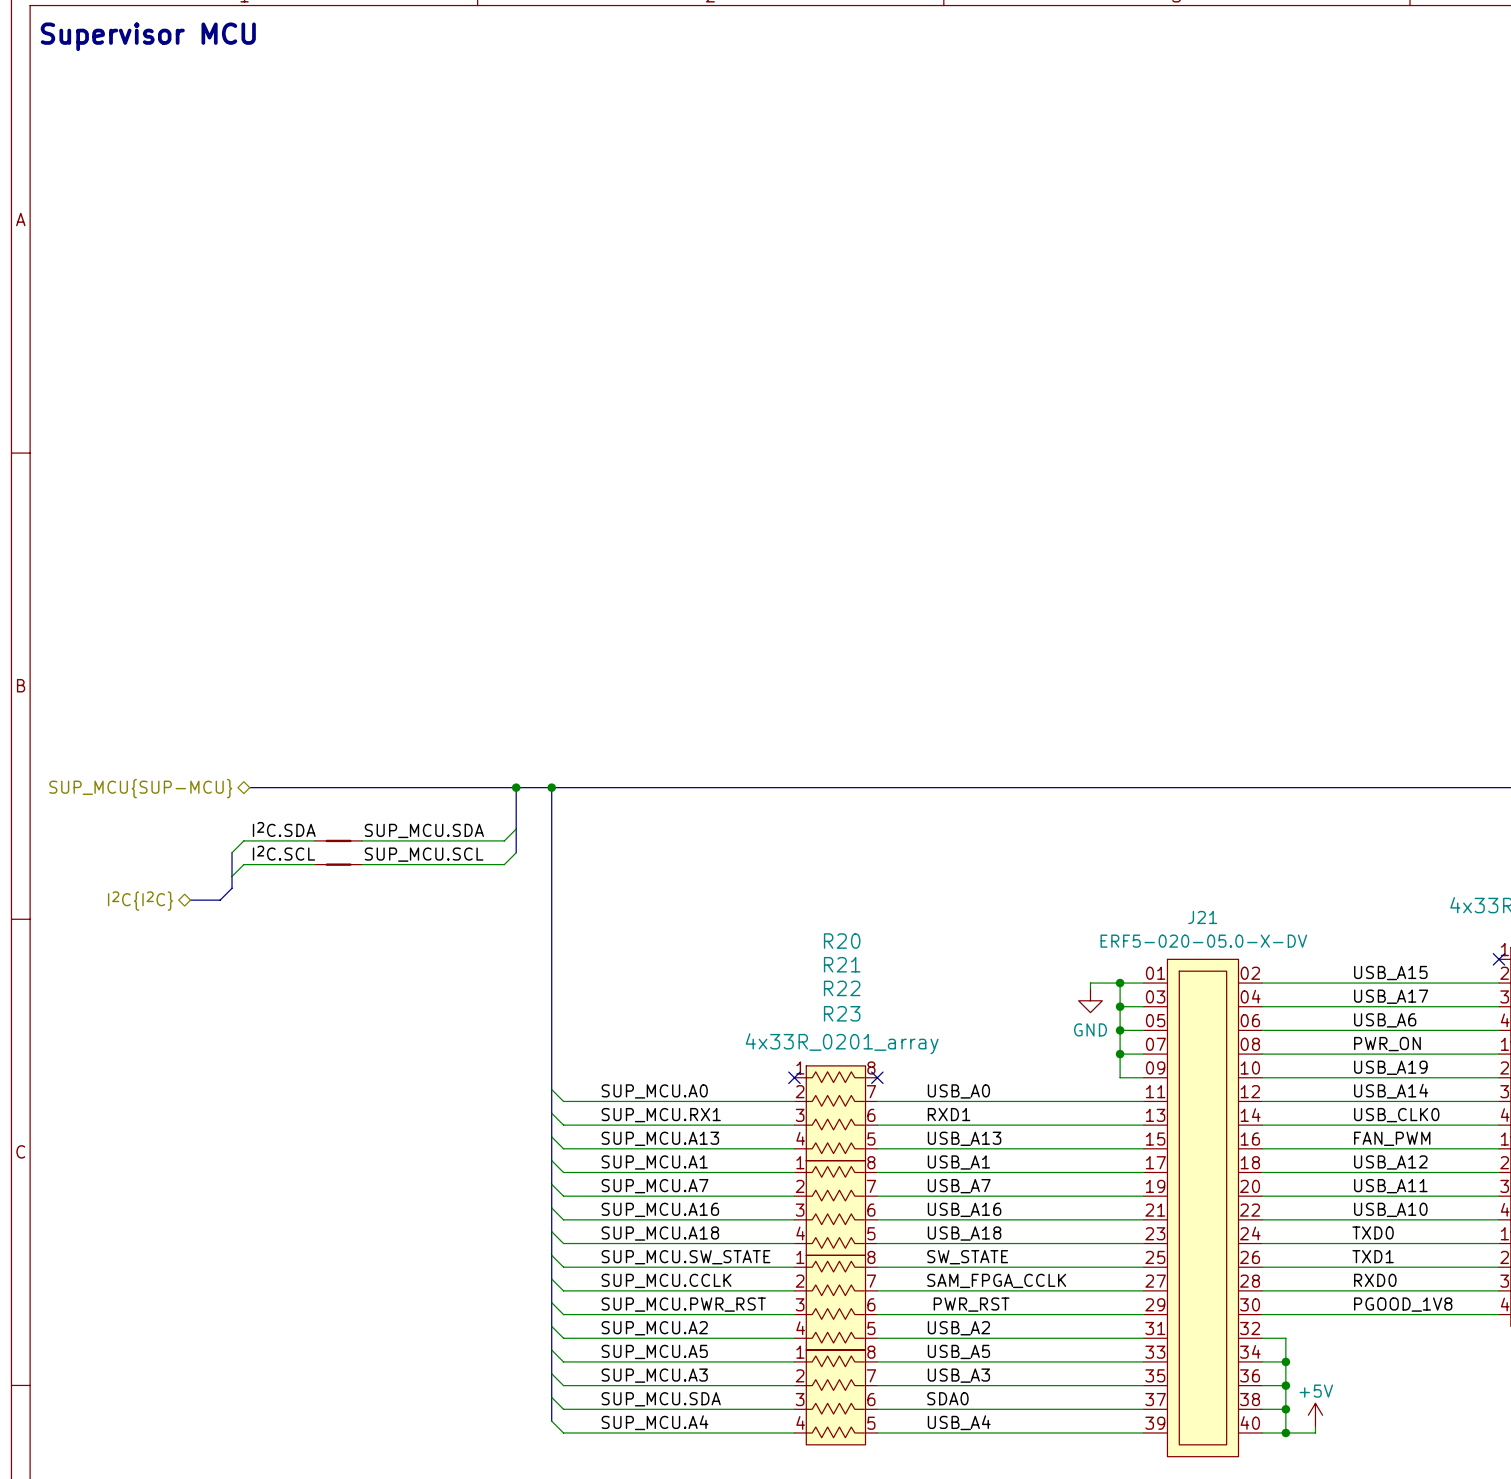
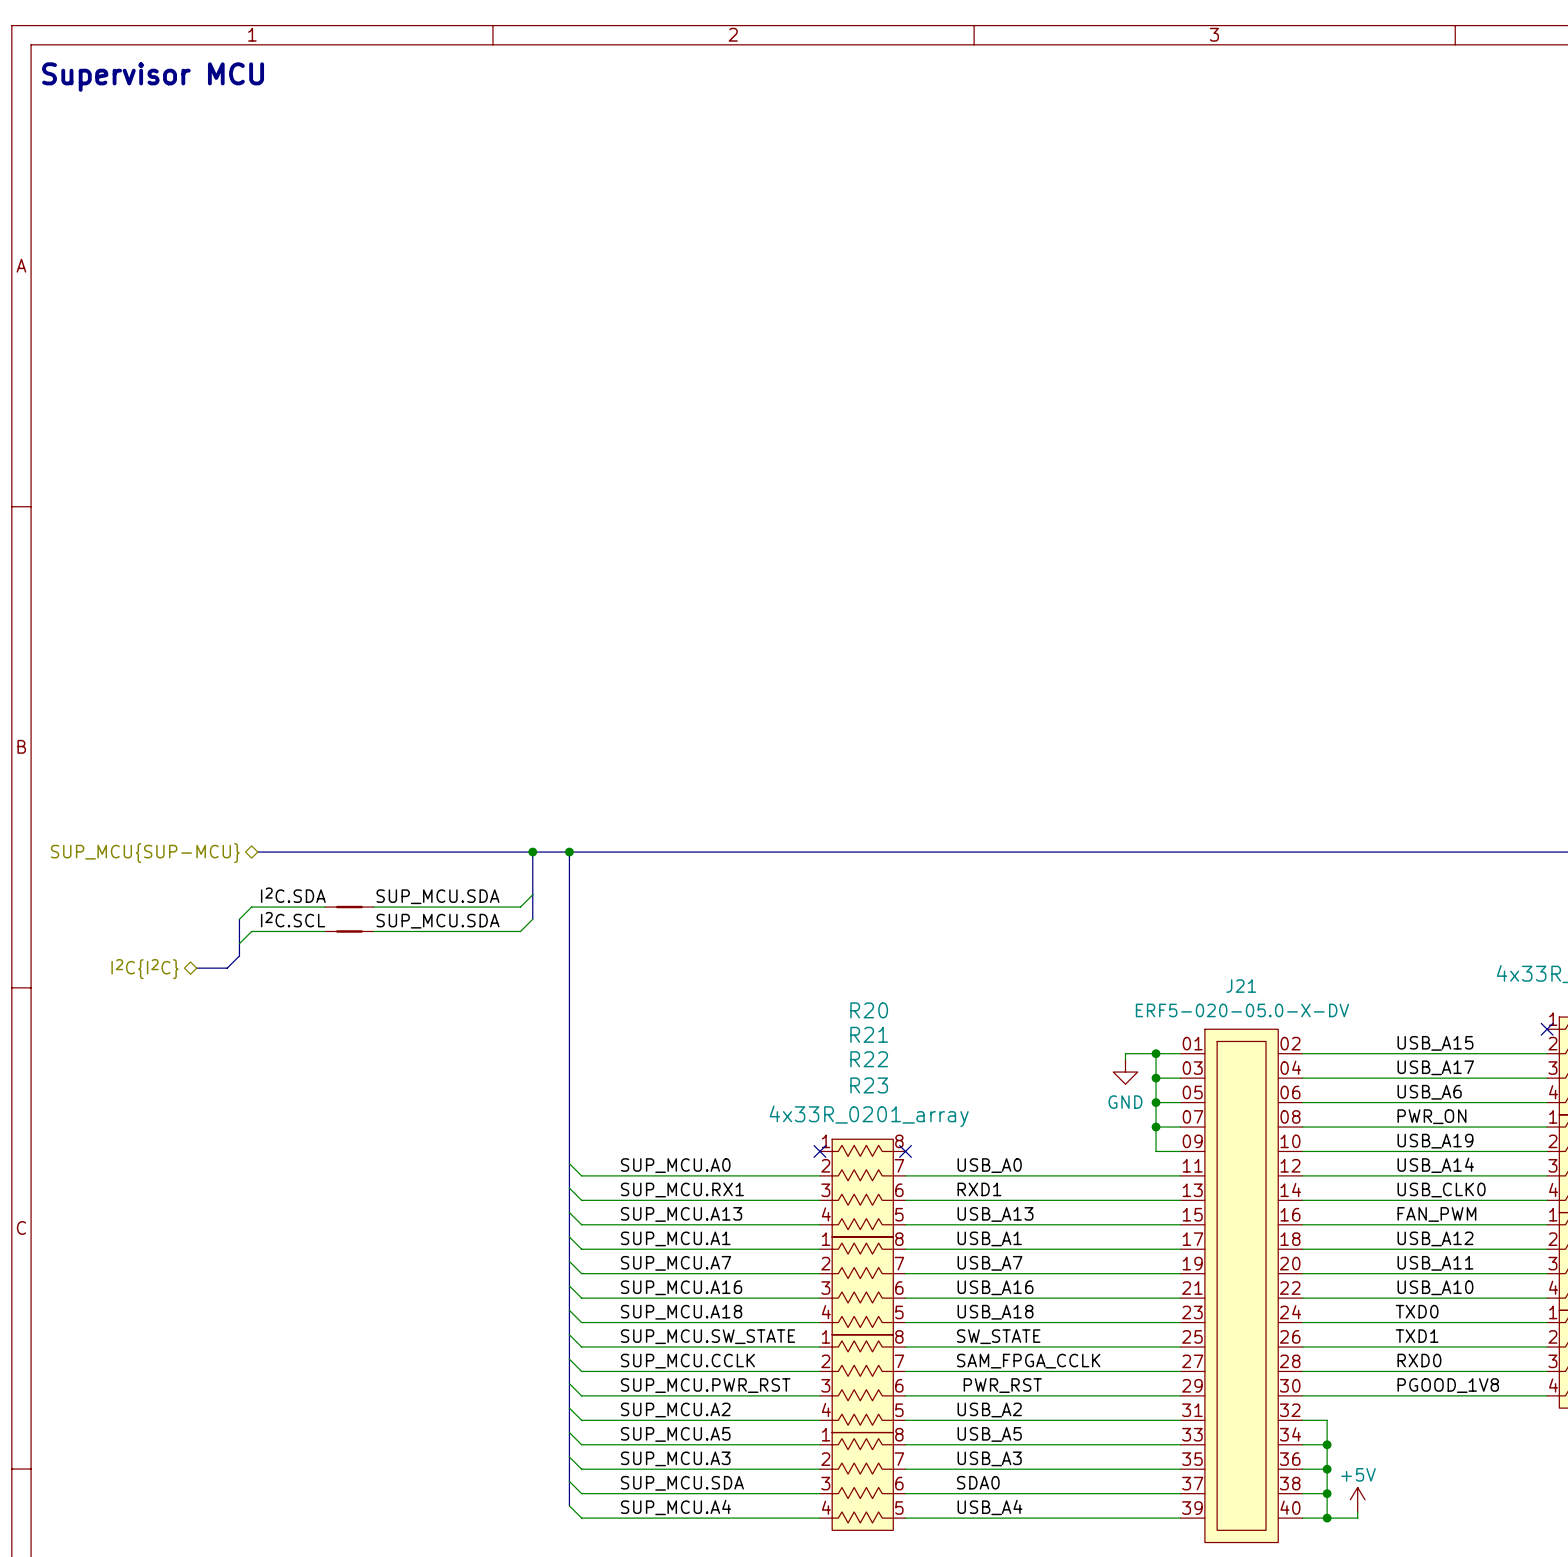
label: SUP_MCU.SCL (424, 854) -> SUP_MCU.SDA (437, 921)

